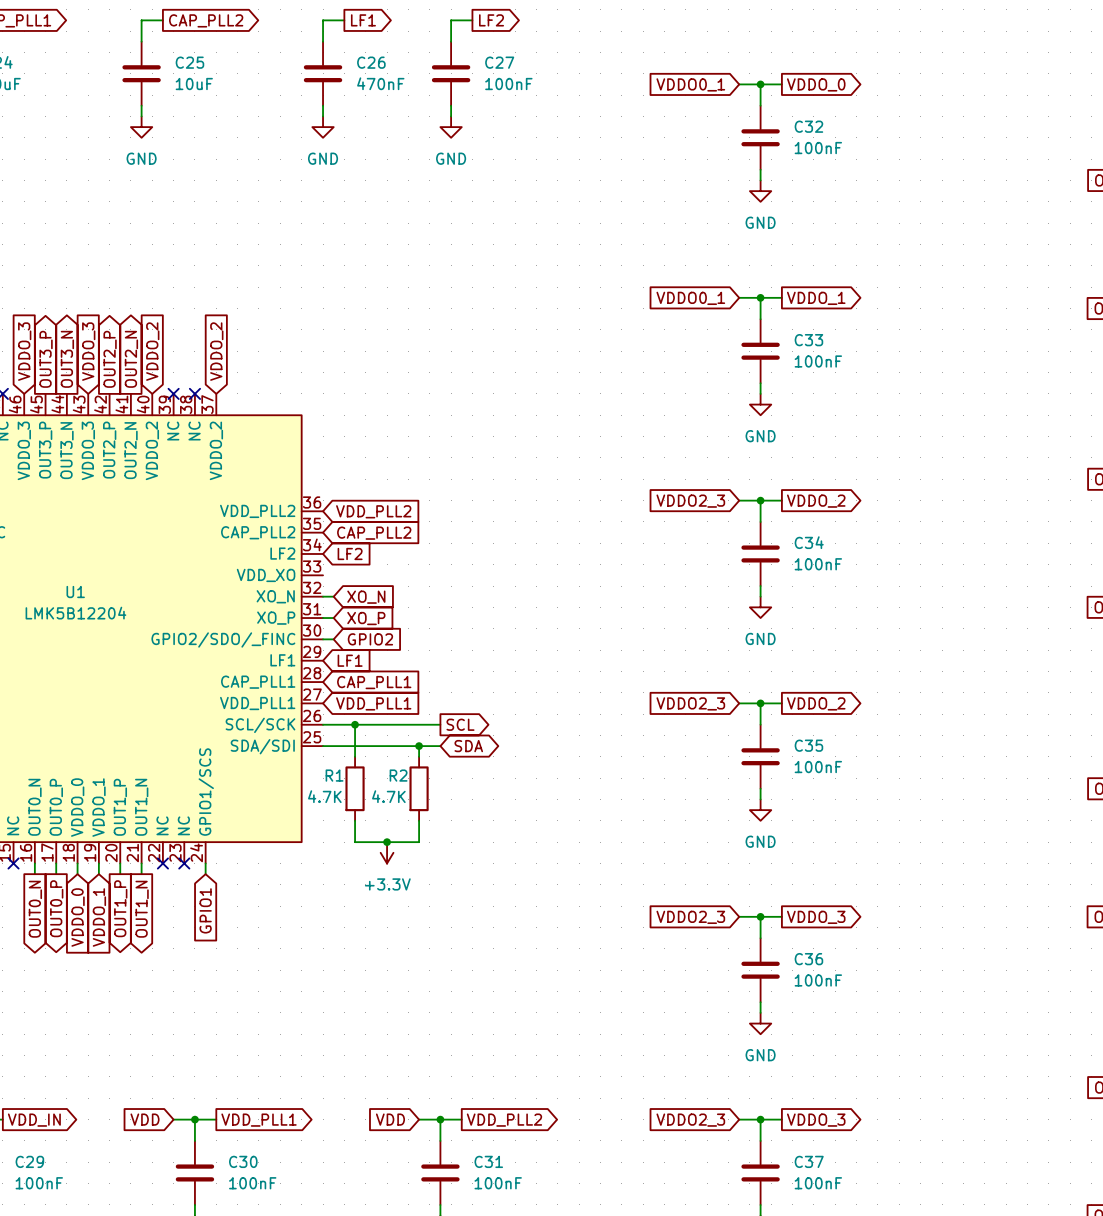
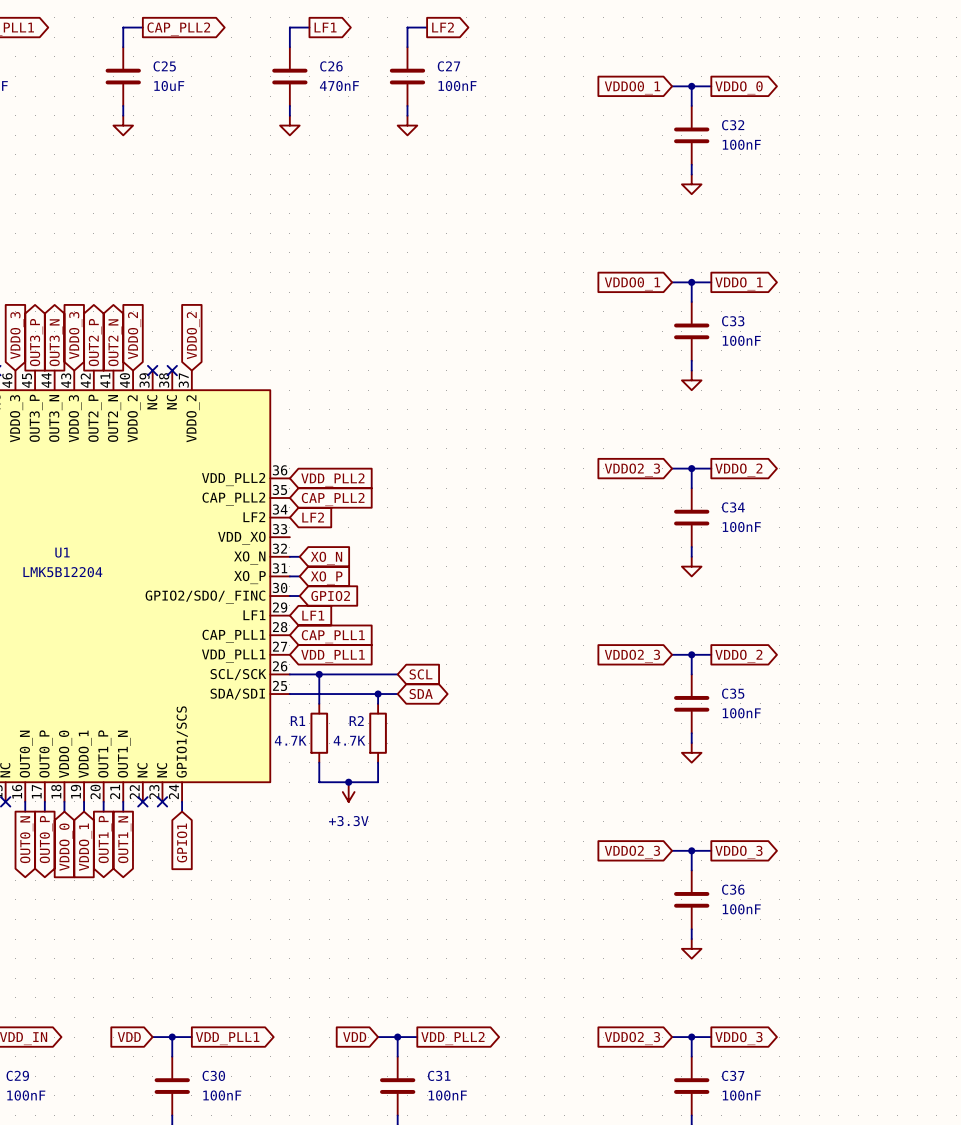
power symbol text: GND (141, 158) -> none
power symbol text: GND (323, 158) -> none
power symbol text: GND (451, 158) -> none
power symbol text: GND (760, 222) -> none
power symbol text: GND (760, 436) -> none
power symbol text: GND (760, 638) -> none
global label shape: output (460, 724) -> input (420, 674)
power symbol text: GND (760, 841) -> none
power symbol text: GND (760, 1055) -> none

